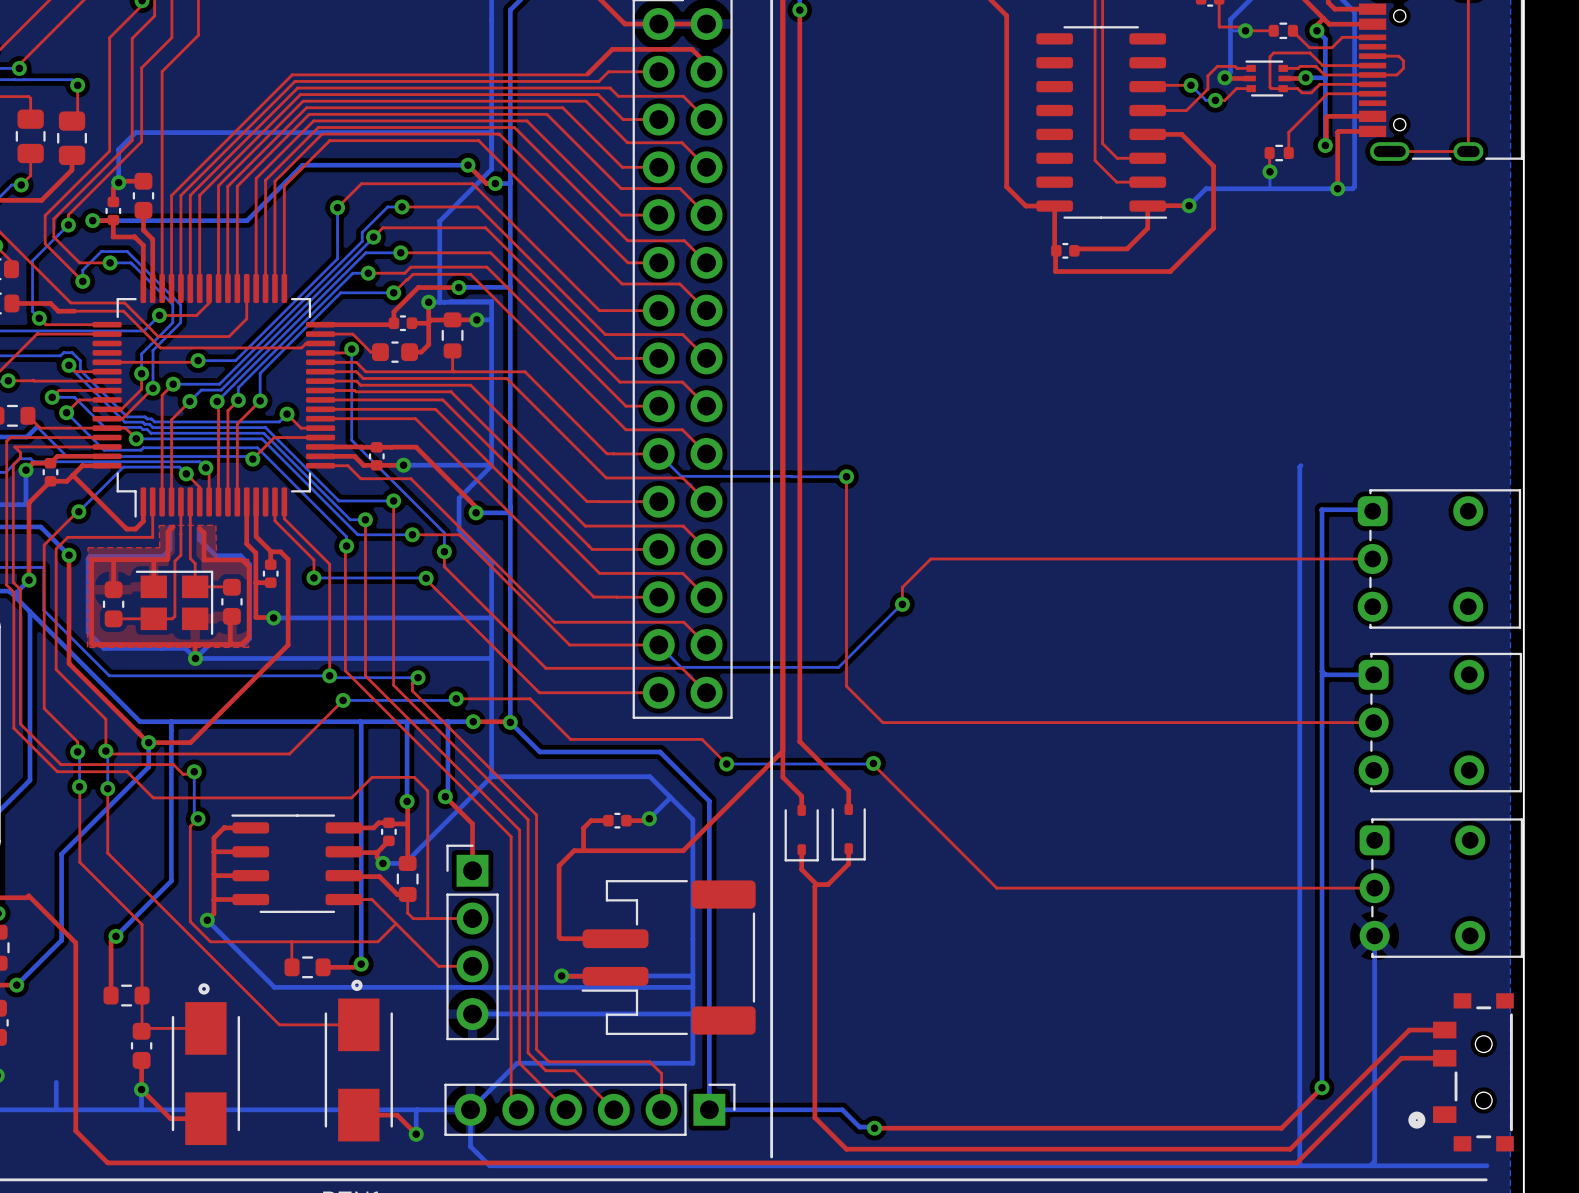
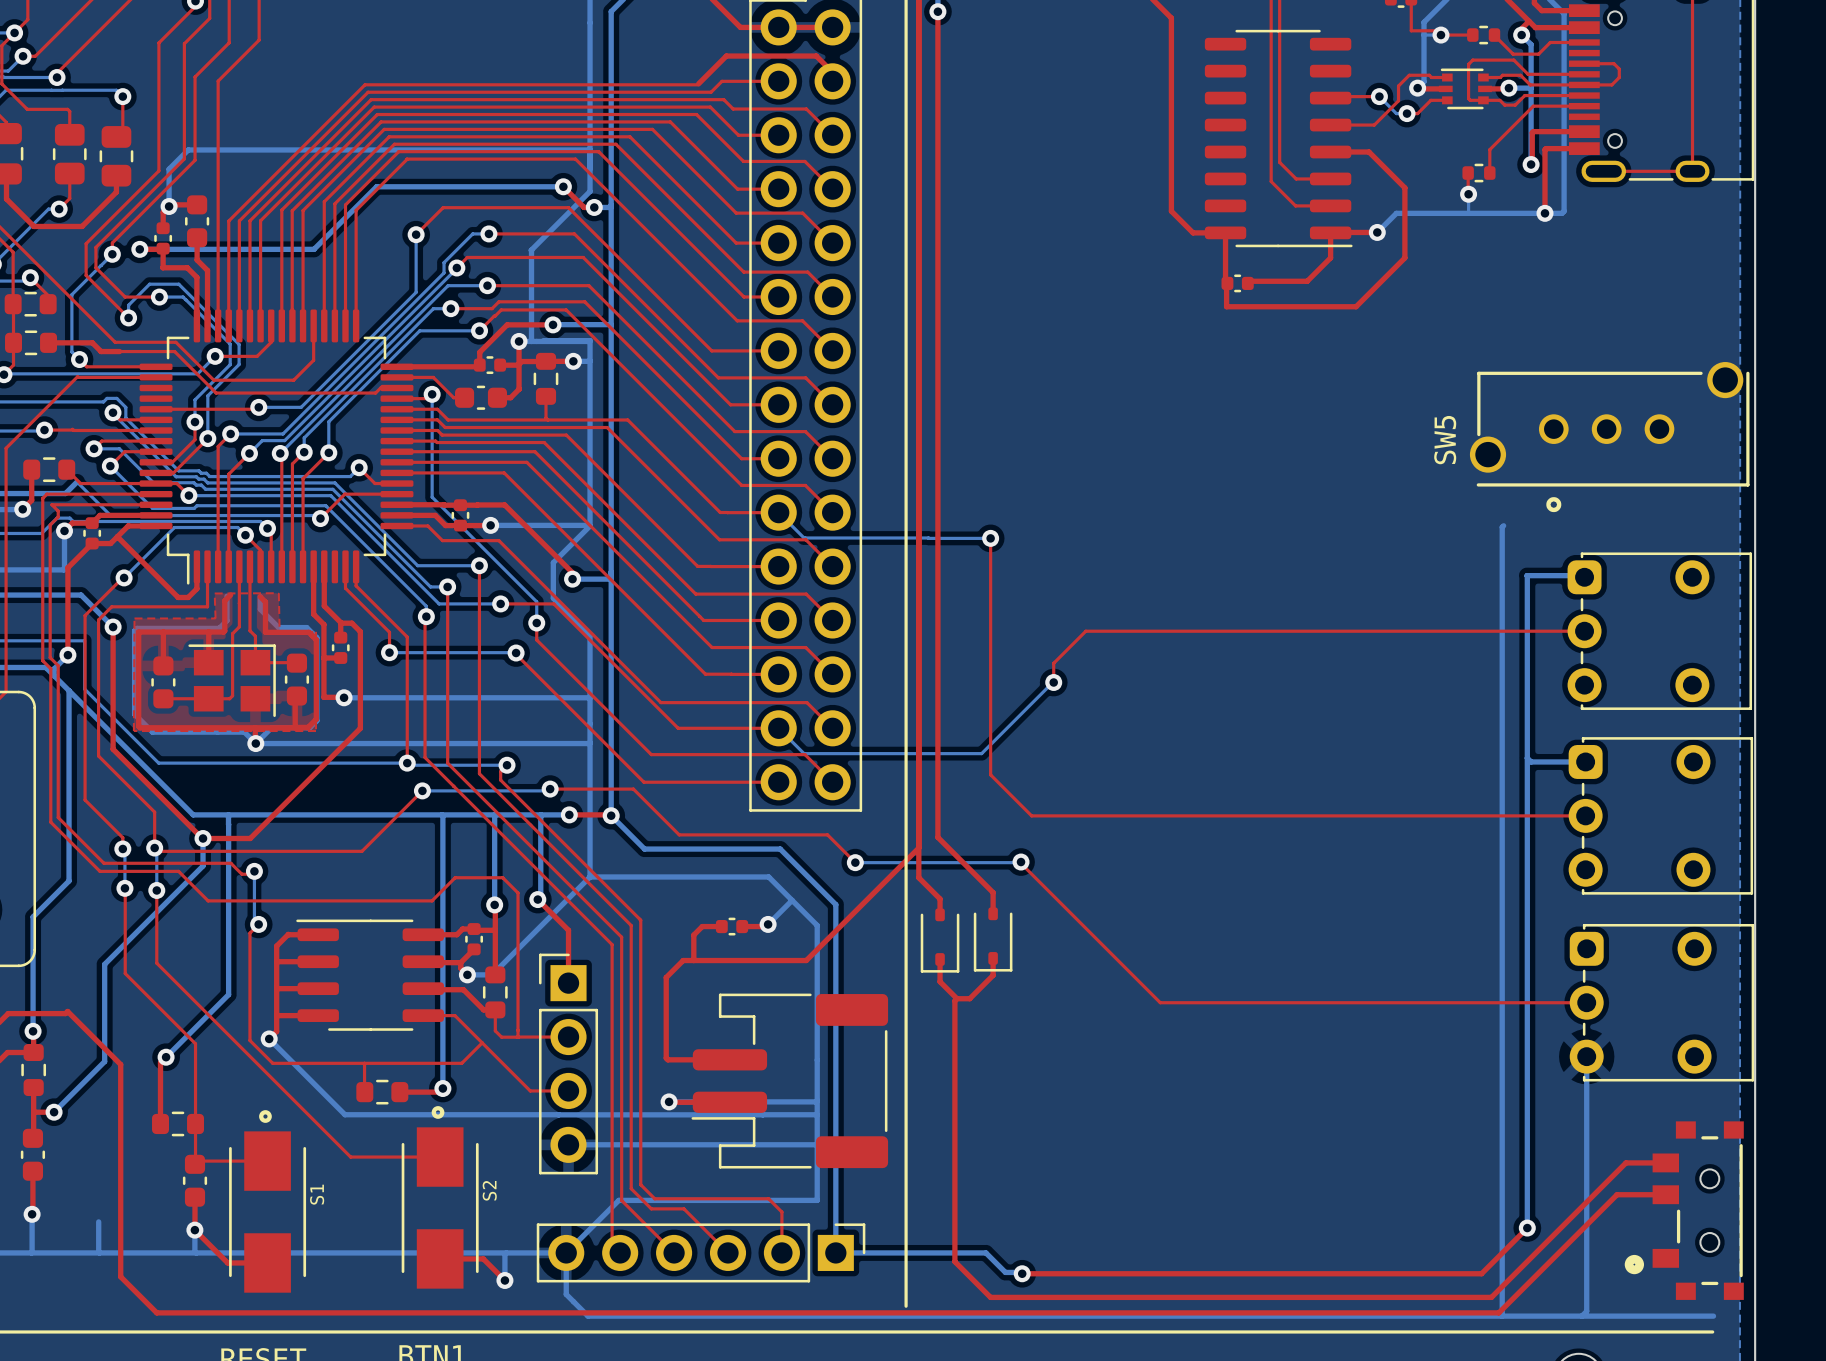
SW5: none -> (1609, 437)
S2 name: none -> S2 (489, 1190)
S1 name: none -> S1 (317, 1194)

